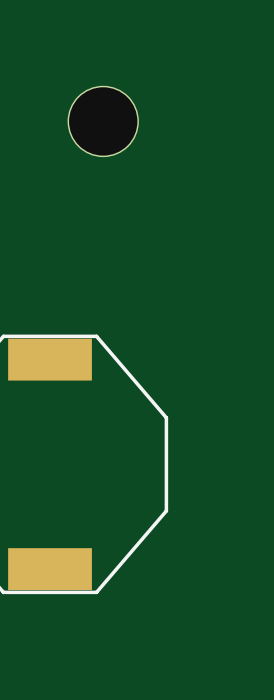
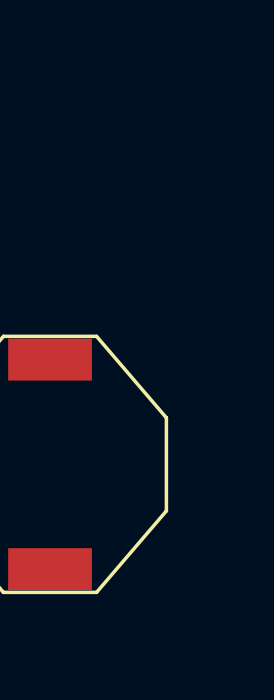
part: (103, 121) -> none

